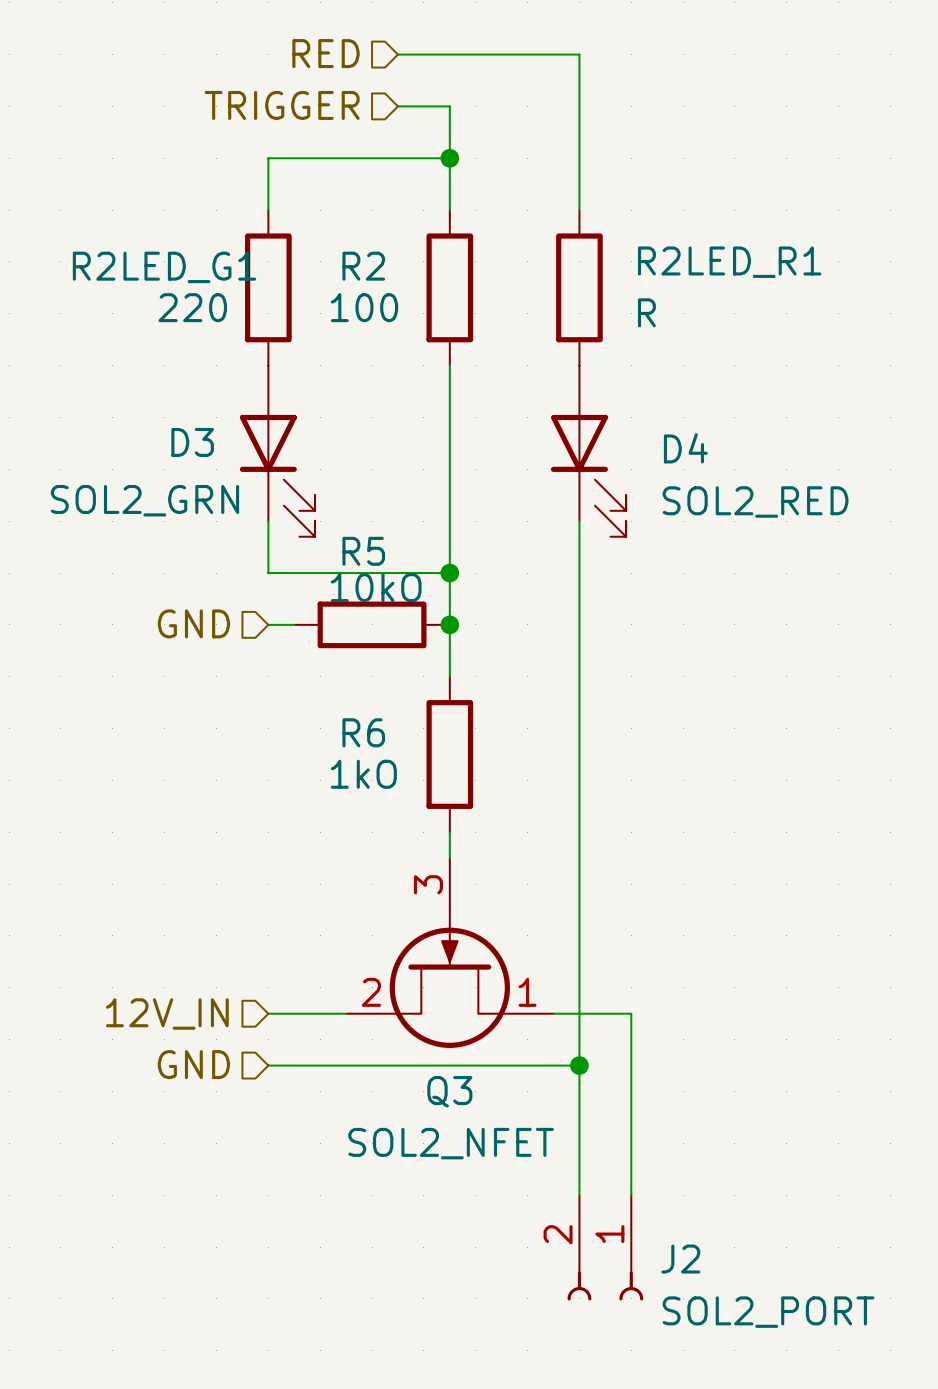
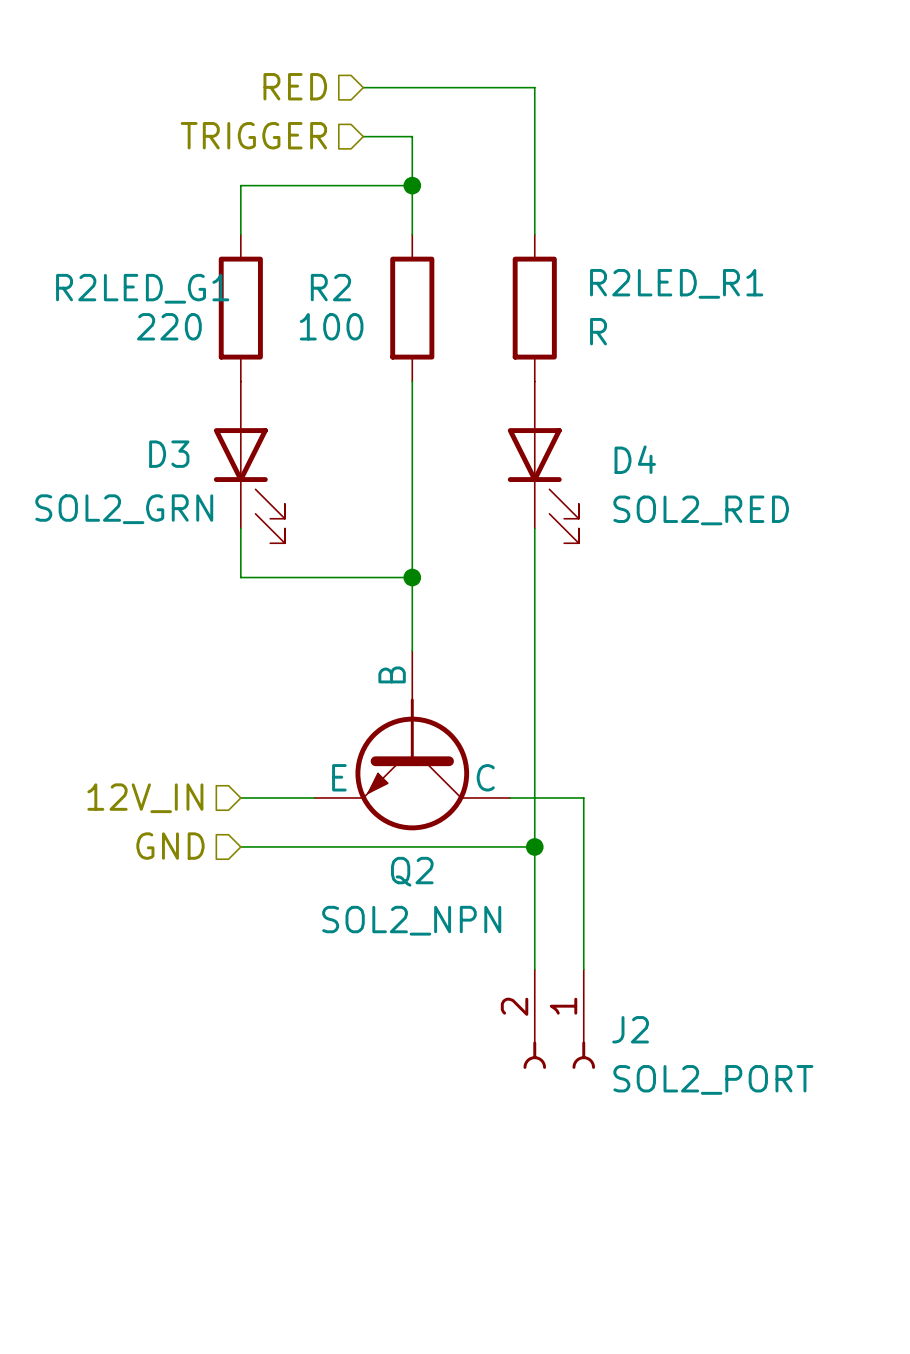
hierarchical label: GND (193, 623) -> none
wire: (268, 624) (294, 624) -> none
R5: 10kO (372, 624) -> none
junction: (449, 624) -> none
Q2: none -> SOL2_NPN (412, 740)
R6: 1kO (449, 754) -> none
wire: (449, 832) (449, 858) -> none
hierarchical label: none -> GND (170, 846)
junction: none -> (534, 846)
Q3: SOL2_NFET (449, 953) -> none
wire: (579, 987) (579, 1195) -> none
hierarchical label position: 12V_IN (167, 1013) -> 12V_IN (145, 798)
wire: (268, 1013) (346, 1013) -> (240, 797) (314, 797)
wire: (553, 1013) (631, 1013) (631, 1195) -> (510, 797) (583, 797) (583, 969)
hierarchical label: GND (193, 1064) -> none
wire: (268, 1065) (579, 1065) -> (240, 846) (534, 846)
junction: (579, 1065) -> none
J2 position: (605, 1247) -> (559, 1019)

